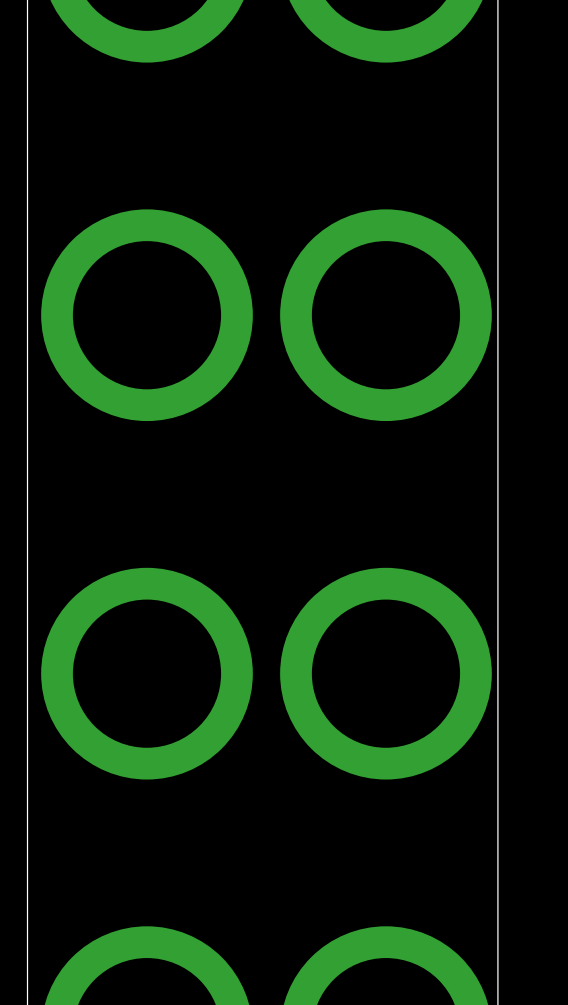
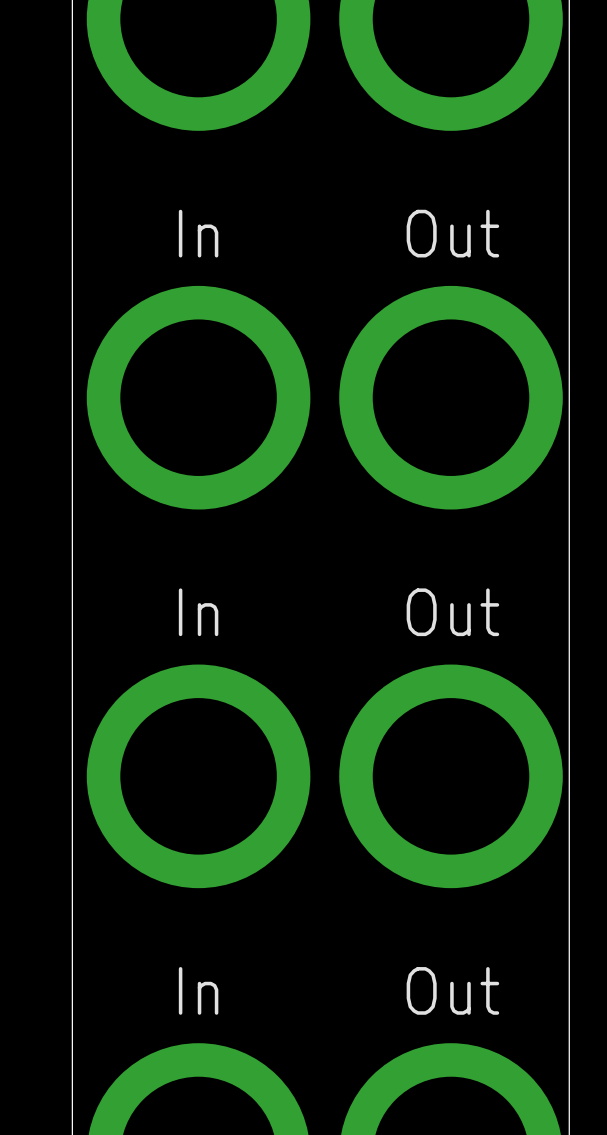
text: none -> In (198, 233)
text: none -> Out (452, 233)
text: none -> In (198, 612)
text: none -> Out (452, 612)
text: none -> In (198, 990)
text: none -> Out (452, 990)

